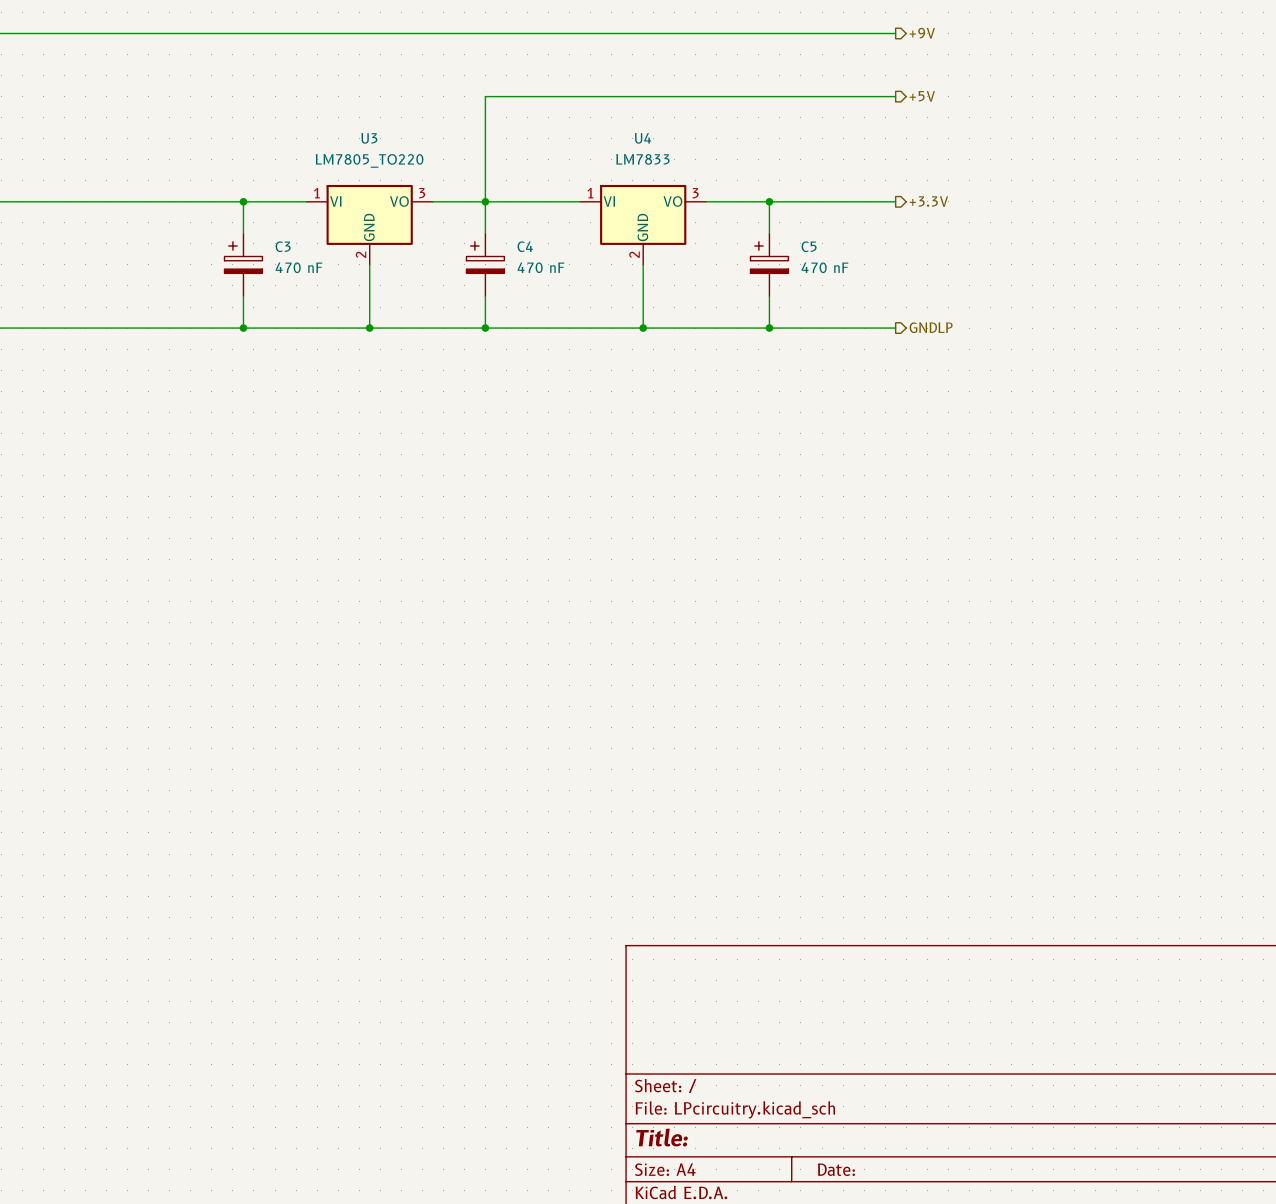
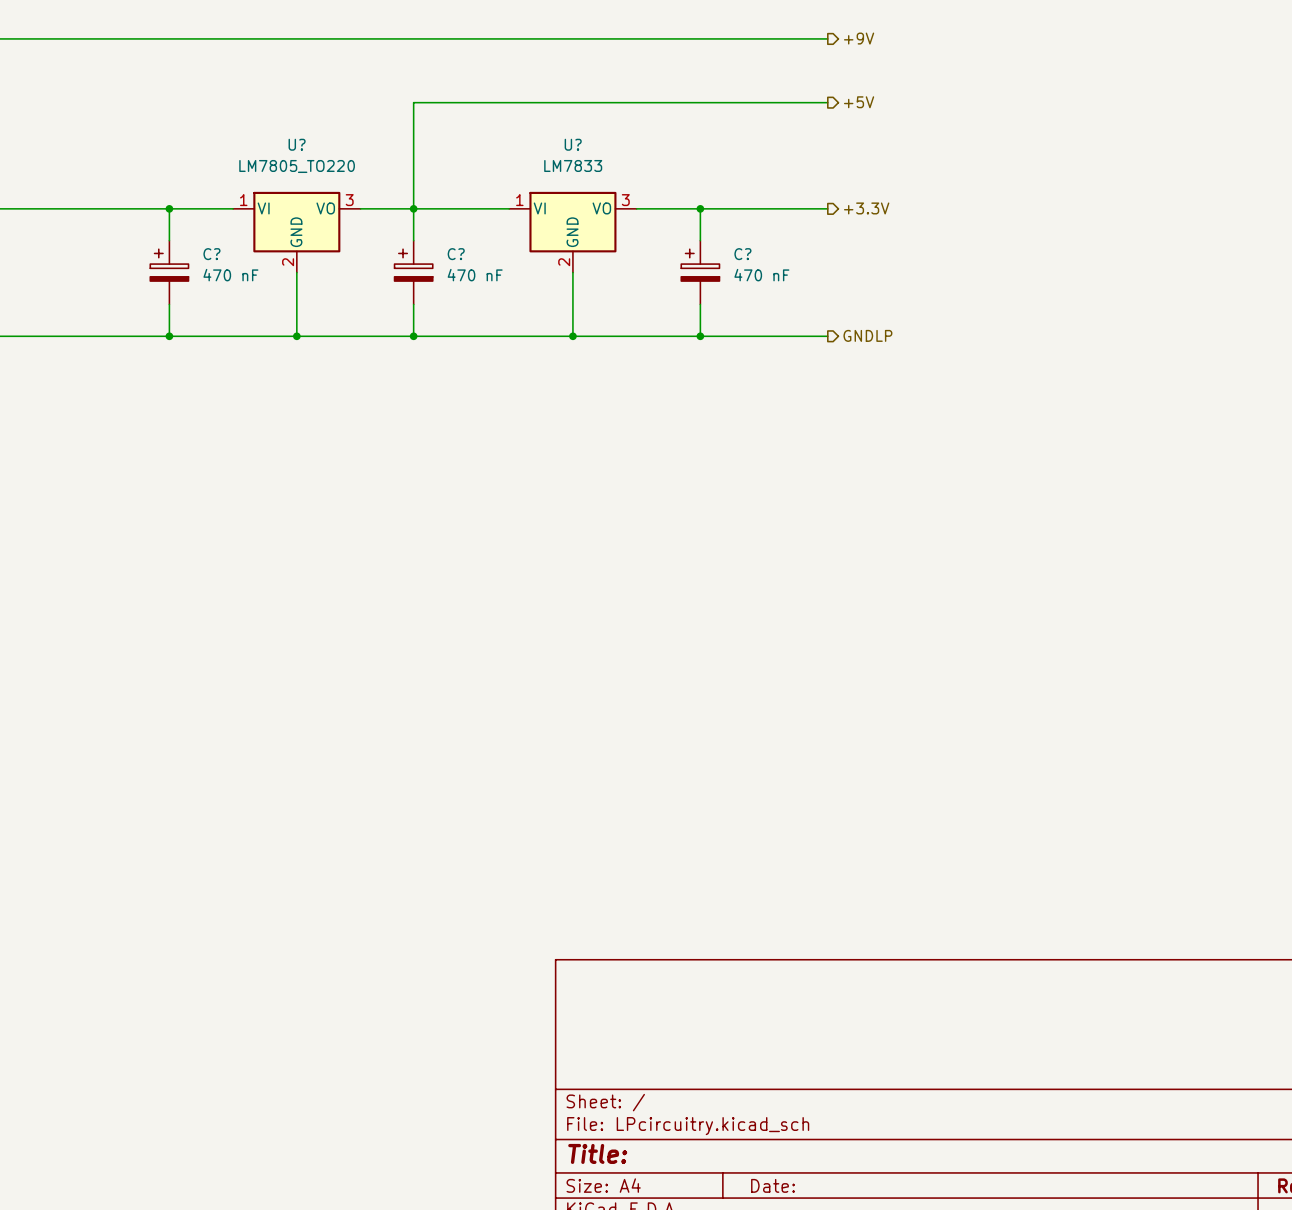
U3 name: U3 (369, 138) -> U? (297, 144)
U4 name: U4 (643, 138) -> U? (573, 144)
C3 name: C3 (283, 246) -> C? (211, 254)
C4 name: C4 (525, 246) -> C? (456, 254)
C5 name: C5 (809, 246) -> C? (742, 254)

